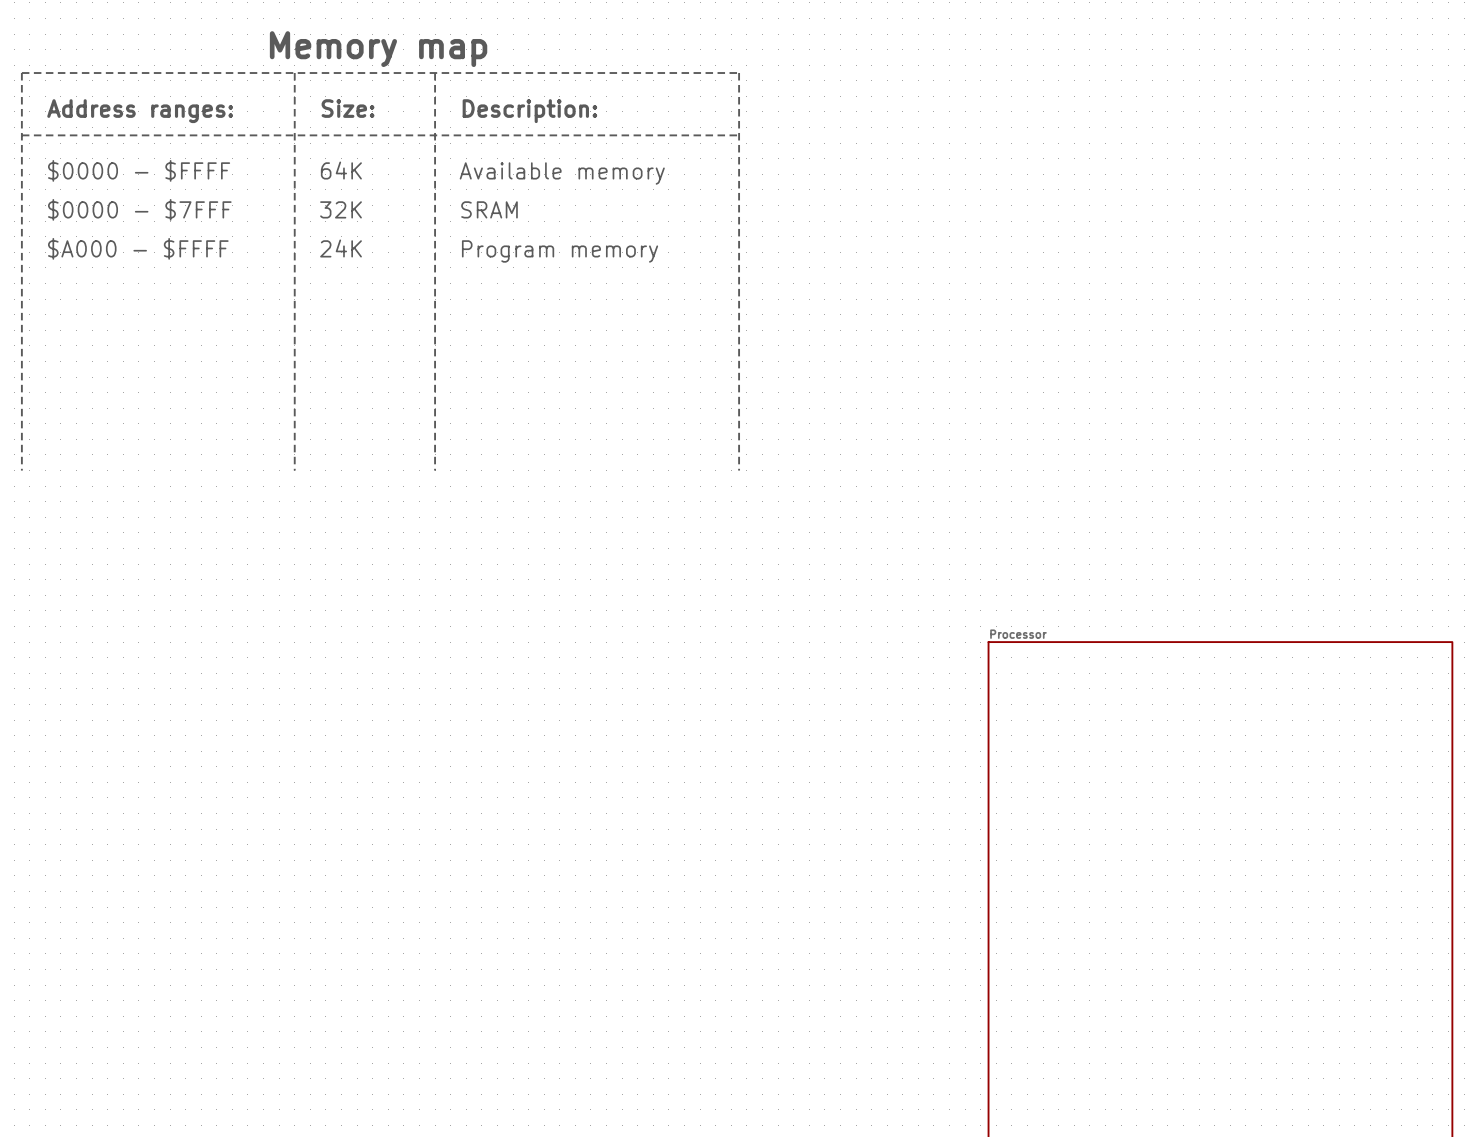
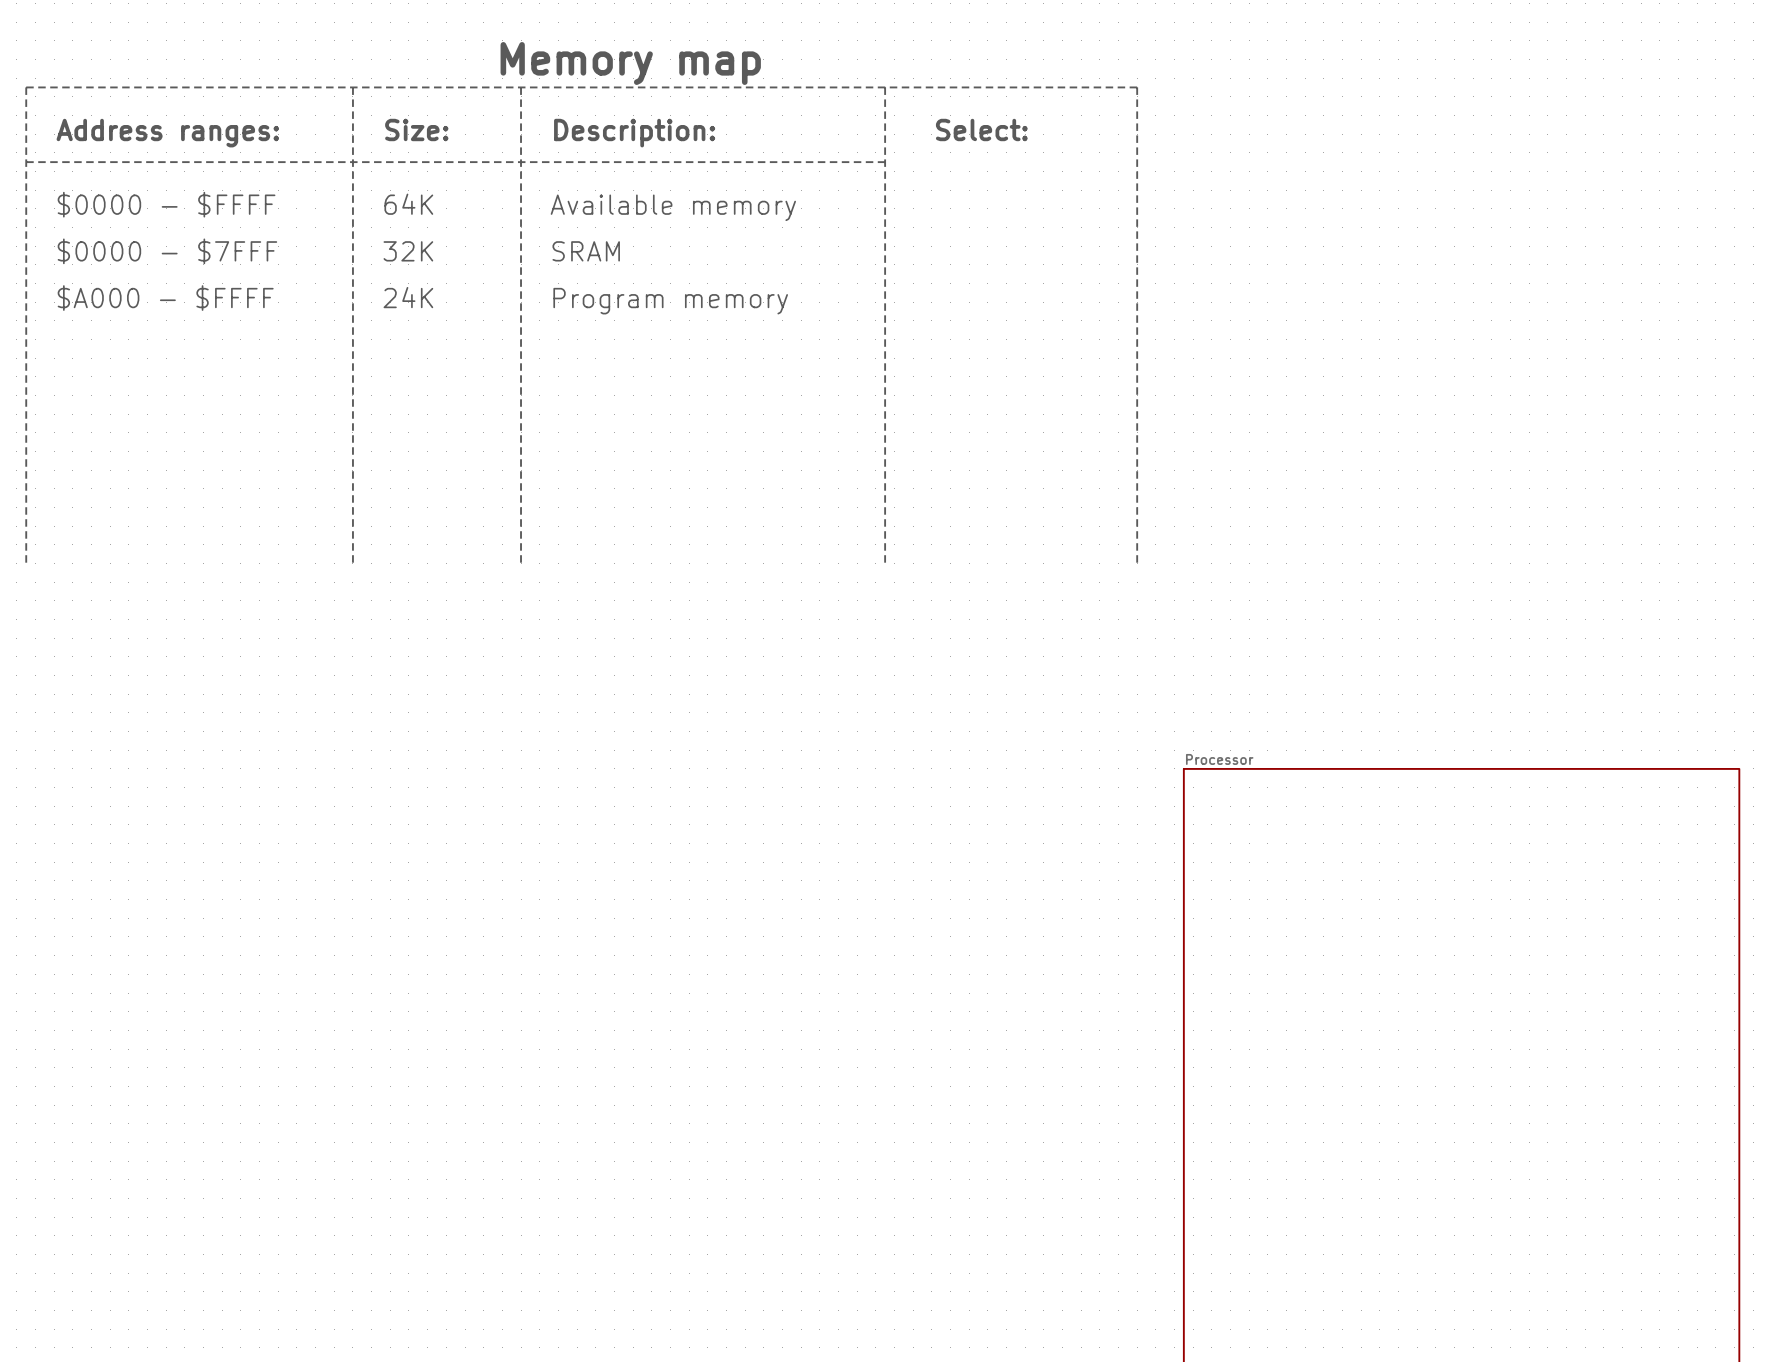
text position: Memory map (378, 49) -> Memory map (630, 63)
line: none -> (885, 87) (1137, 87) (1137, 563)
text: none -> Select: (981, 129)

